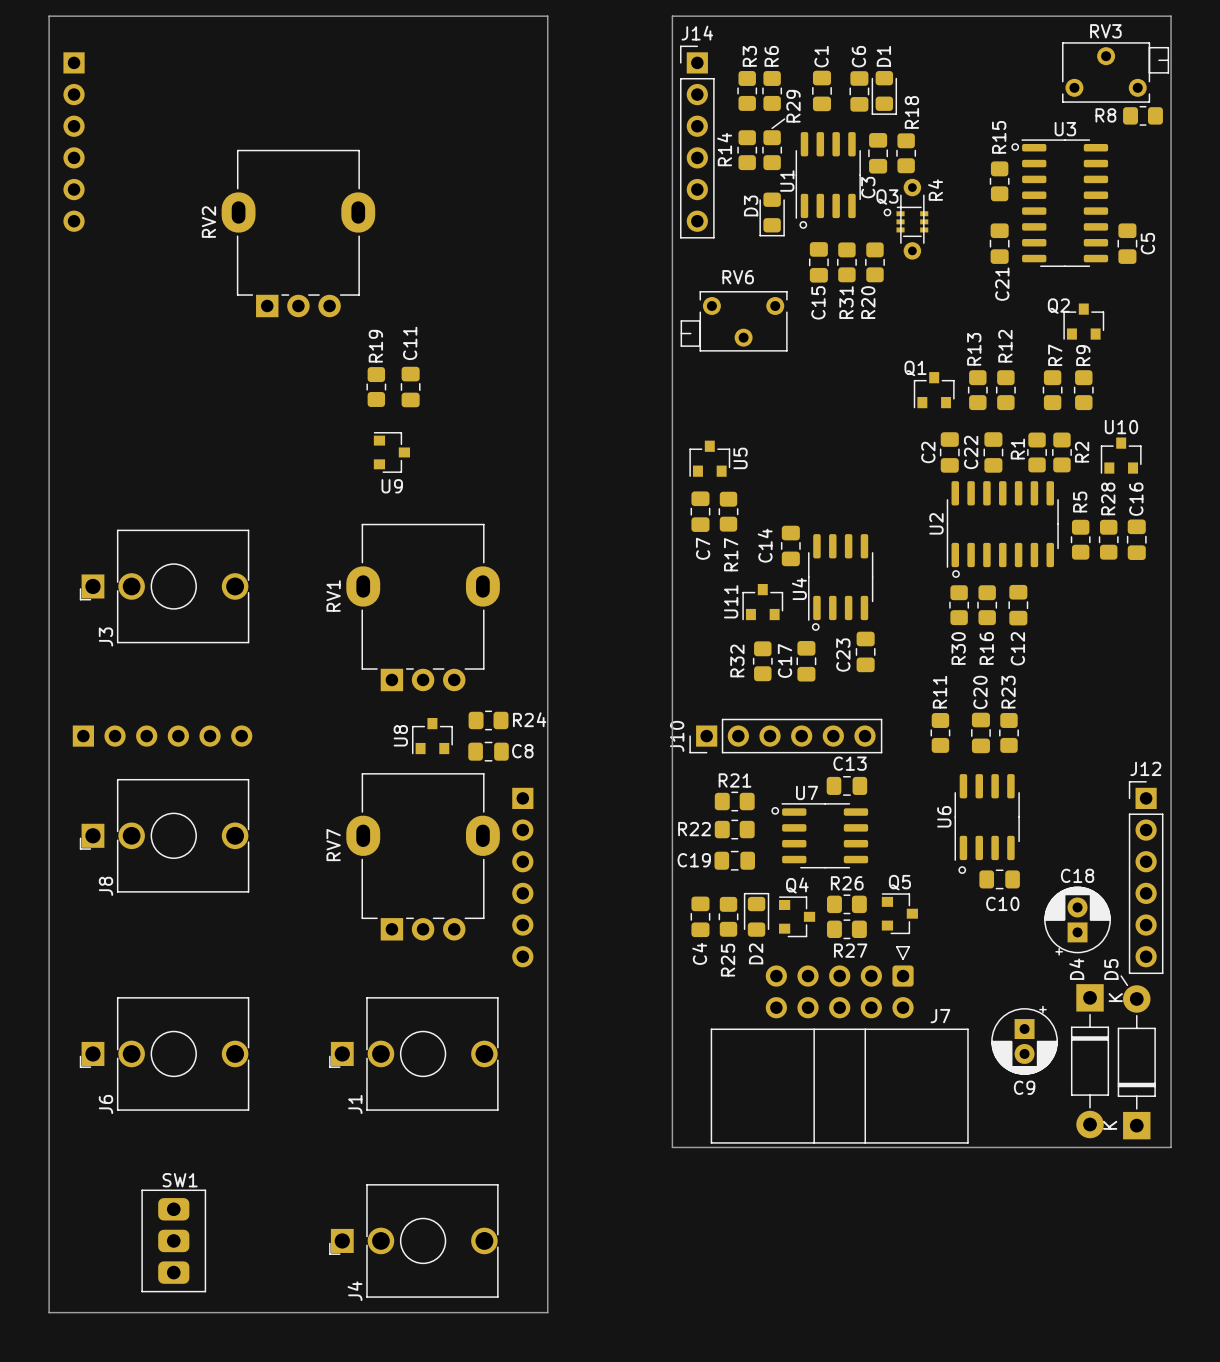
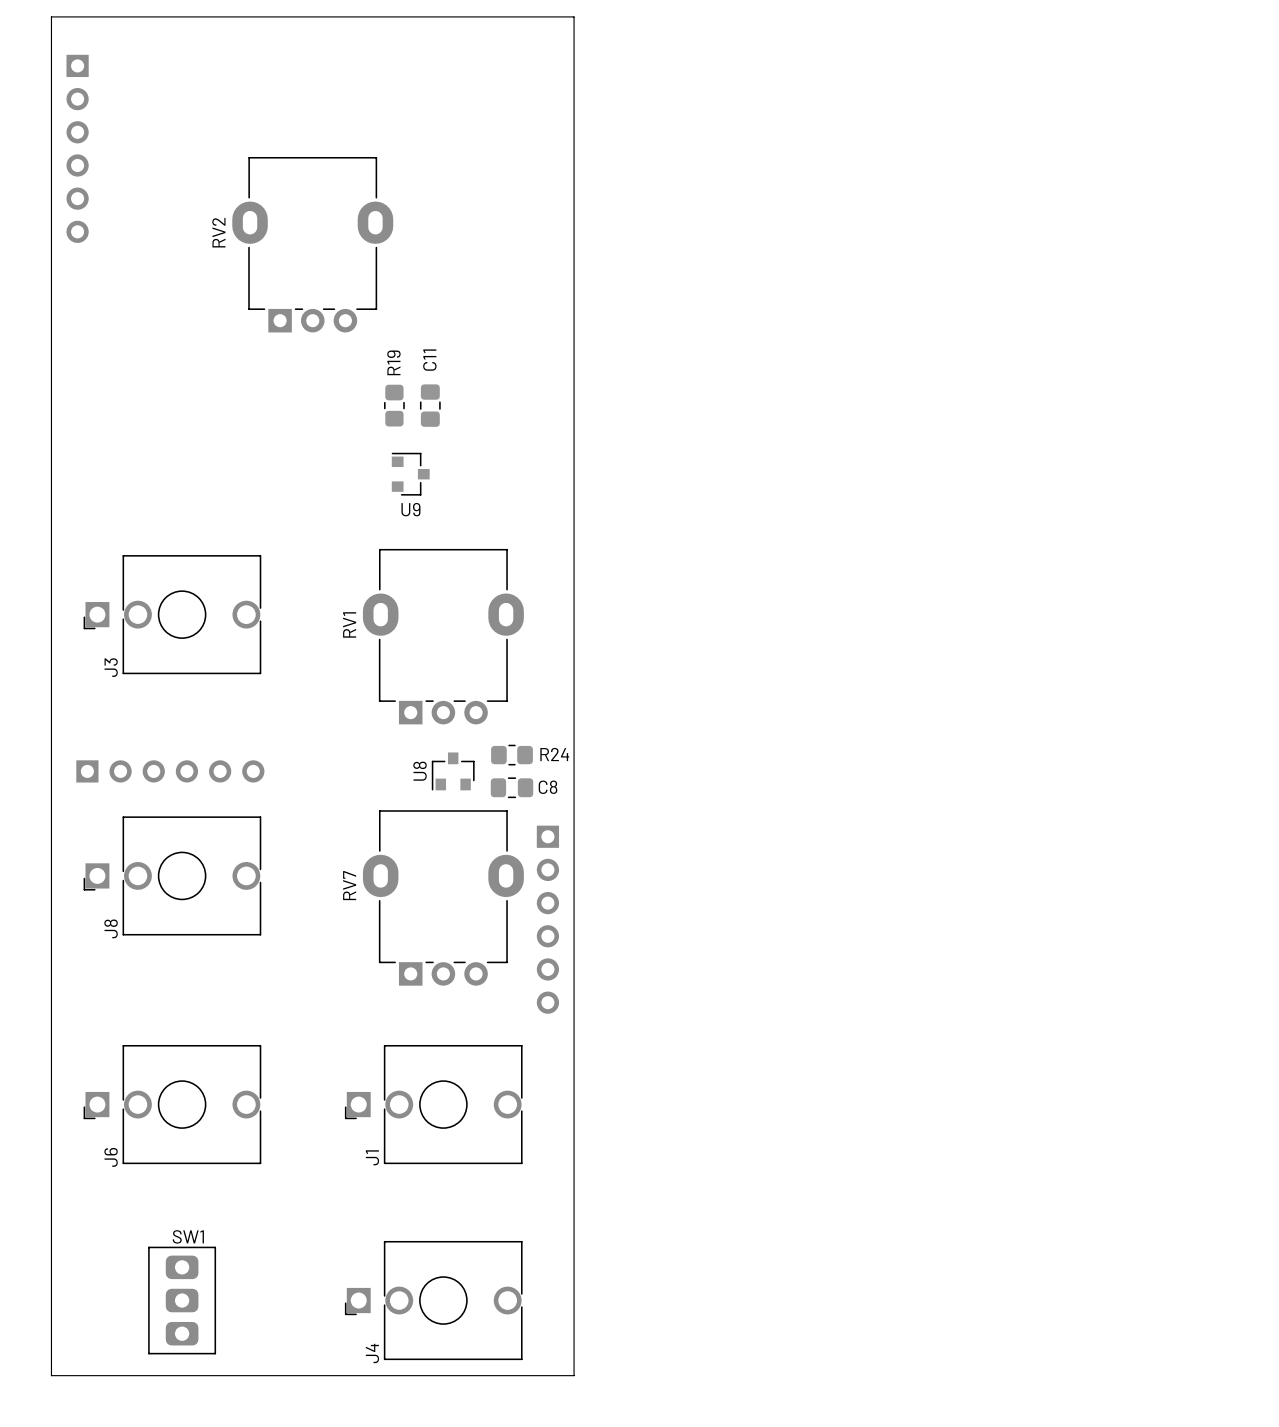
board edge: (672, 16) (672, 1147) (1171, 1147) (1171, 16) (672, 16) -> none
RV3: (1115, 72) -> none
R3: (747, 90) -> none
R6: (772, 90) -> none
C1: (822, 90) -> none
C6: (859, 91) -> none
D1: (884, 92) -> none
R8: (1143, 115) -> none
line: (784, 119) (772, 128) -> none
J14: (697, 142) -> none
drawing: [1011, 143, 1020, 151] -> none
R14: (747, 150) -> none
R29: (772, 150) -> none
C3: (878, 153) -> none
R18: (906, 153) -> none
U1: (828, 175) -> none
R15: (999, 181) -> none
U3: (1064, 203) -> none
drawing: [883, 208, 892, 217] -> none
D3: (772, 214) -> none
R4: (912, 219) -> none
drawing: [799, 221, 808, 229] -> none
Q3: (912, 221) -> none
C21: (999, 243) -> none
C5: (1127, 243) -> none
C15: (818, 262) -> none
R31: (846, 262) -> none
R20: (874, 262) -> none
RV6: (734, 321) -> none
Q2: (1083, 321) -> none
Q1: (934, 390) -> none
R13: (977, 390) -> none
R12: (1005, 390) -> none
R7: (1052, 390) -> none
R9: (1083, 390) -> none
C2: (949, 452) -> none
C22: (993, 452) -> none
R1: (1037, 452) -> none
R2: (1061, 452) -> none
U10: (1121, 455) -> none
U5: (709, 458) -> none
C7: (700, 511) -> none
R17: (728, 511) -> none
U2: (1002, 524) -> none
R5: (1080, 539) -> none
R28: (1108, 539) -> none
C16: (1136, 539) -> none
C14: (790, 545) -> none
drawing: [952, 570, 960, 578] -> none
U4: (840, 577) -> none
U11: (762, 602) -> none
R30: (959, 605) -> none
R16: (987, 605) -> none
C12: (1018, 605) -> none
drawing: [811, 623, 820, 631] -> none
C23: (865, 651) -> none
R32: (762, 661) -> none
C17: (806, 661) -> none
R11: (940, 732) -> none
C20: (980, 732) -> none
R23: (1008, 732) -> none
J10: (785, 736) -> none
C13: (846, 785) -> none
R21: (734, 801) -> none
drawing: [771, 807, 780, 815] -> none
U6: (987, 817) -> none
R22: (734, 829) -> none
U7: (824, 835) -> none
C19: (734, 860) -> none
drawing: [958, 866, 967, 874] -> none
J12: (1146, 877) -> none
C10: (999, 879) -> none
R26: (846, 904) -> none
Q5: (899, 913) -> none
D2: (756, 914) -> none
C4: (700, 916) -> none
R25: (728, 916) -> none
Q4: (797, 916) -> none
C18: (1077, 921) -> none
R27: (846, 929) -> none
line: (1121, 976) (1127, 985) -> none
C9: (1024, 1040) -> none
J7: (839, 1044) -> none
D4: (1090, 1061) -> none
D5: (1136, 1062) -> none

